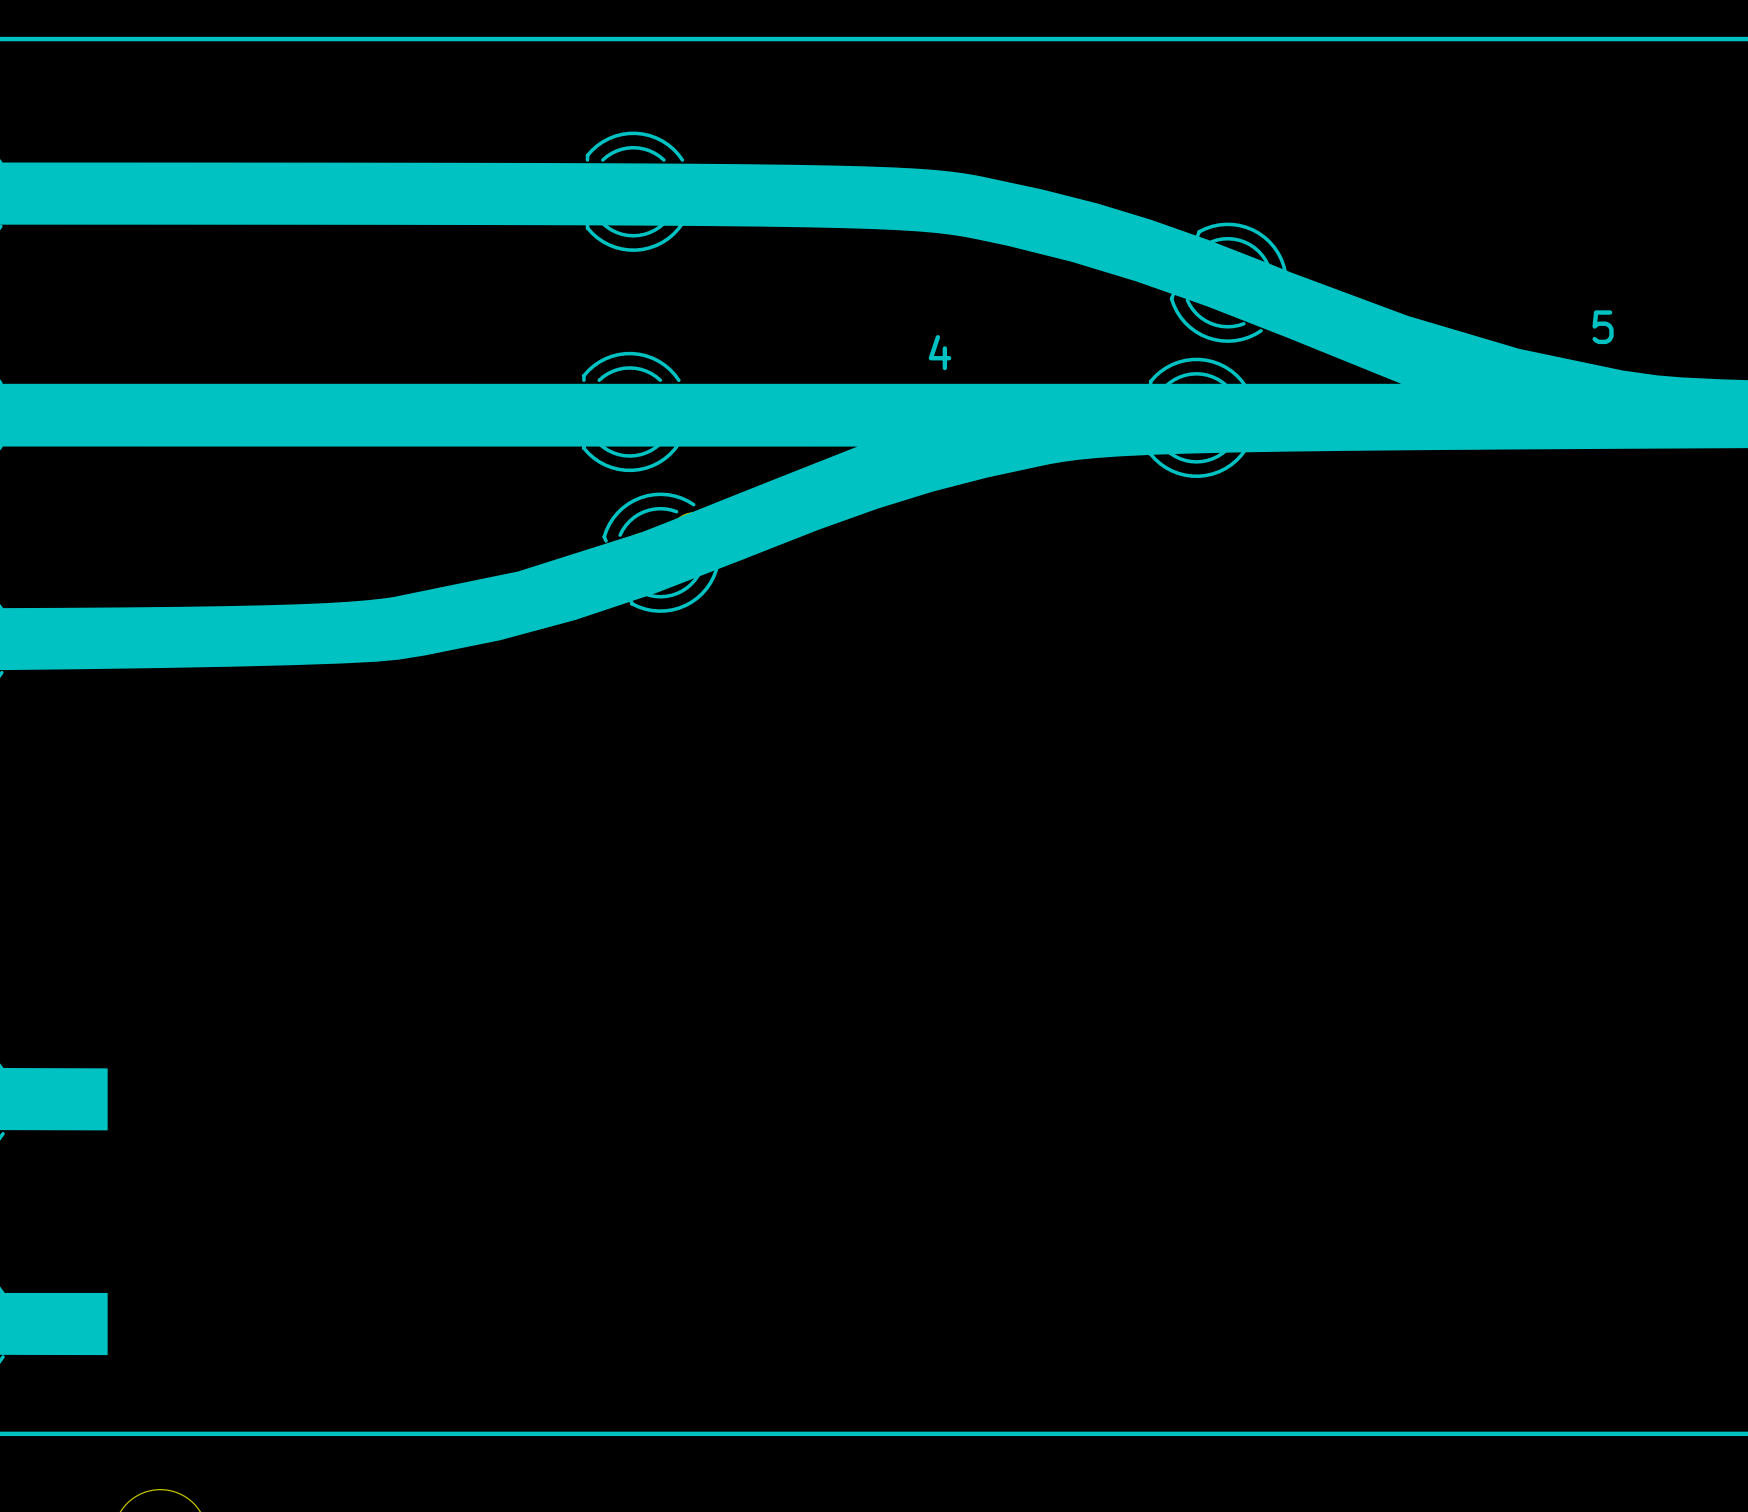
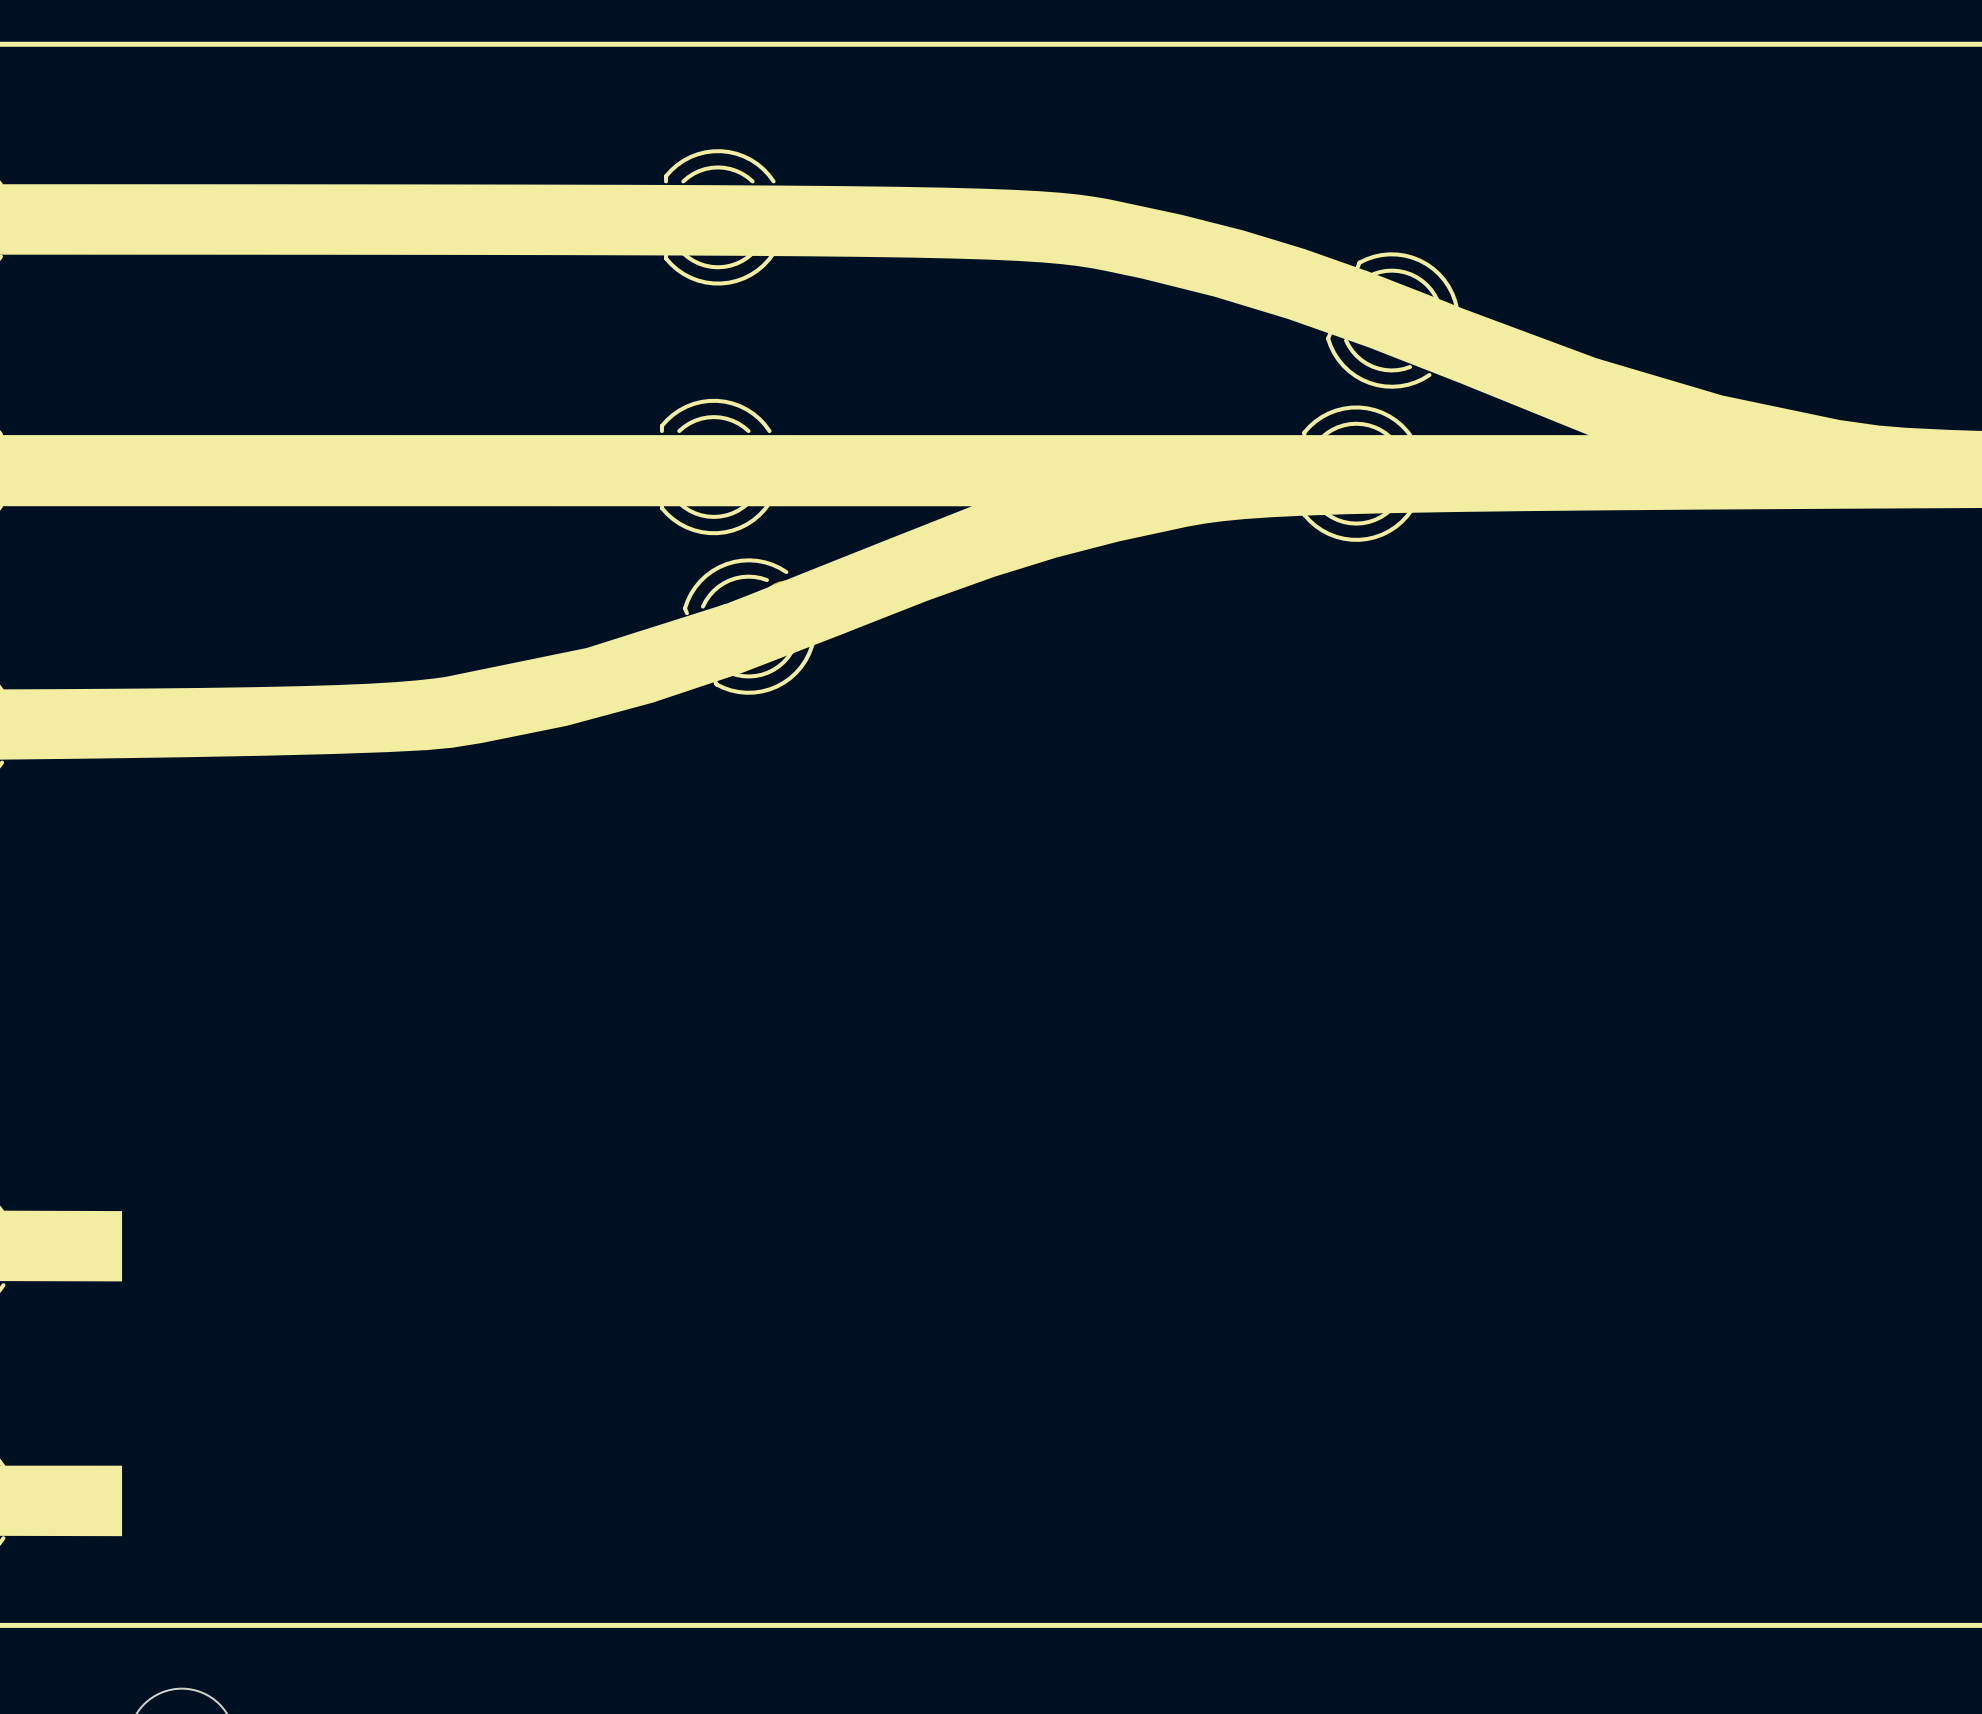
text: 5 (1603, 327) -> none
text: 4 (939, 352) -> none

